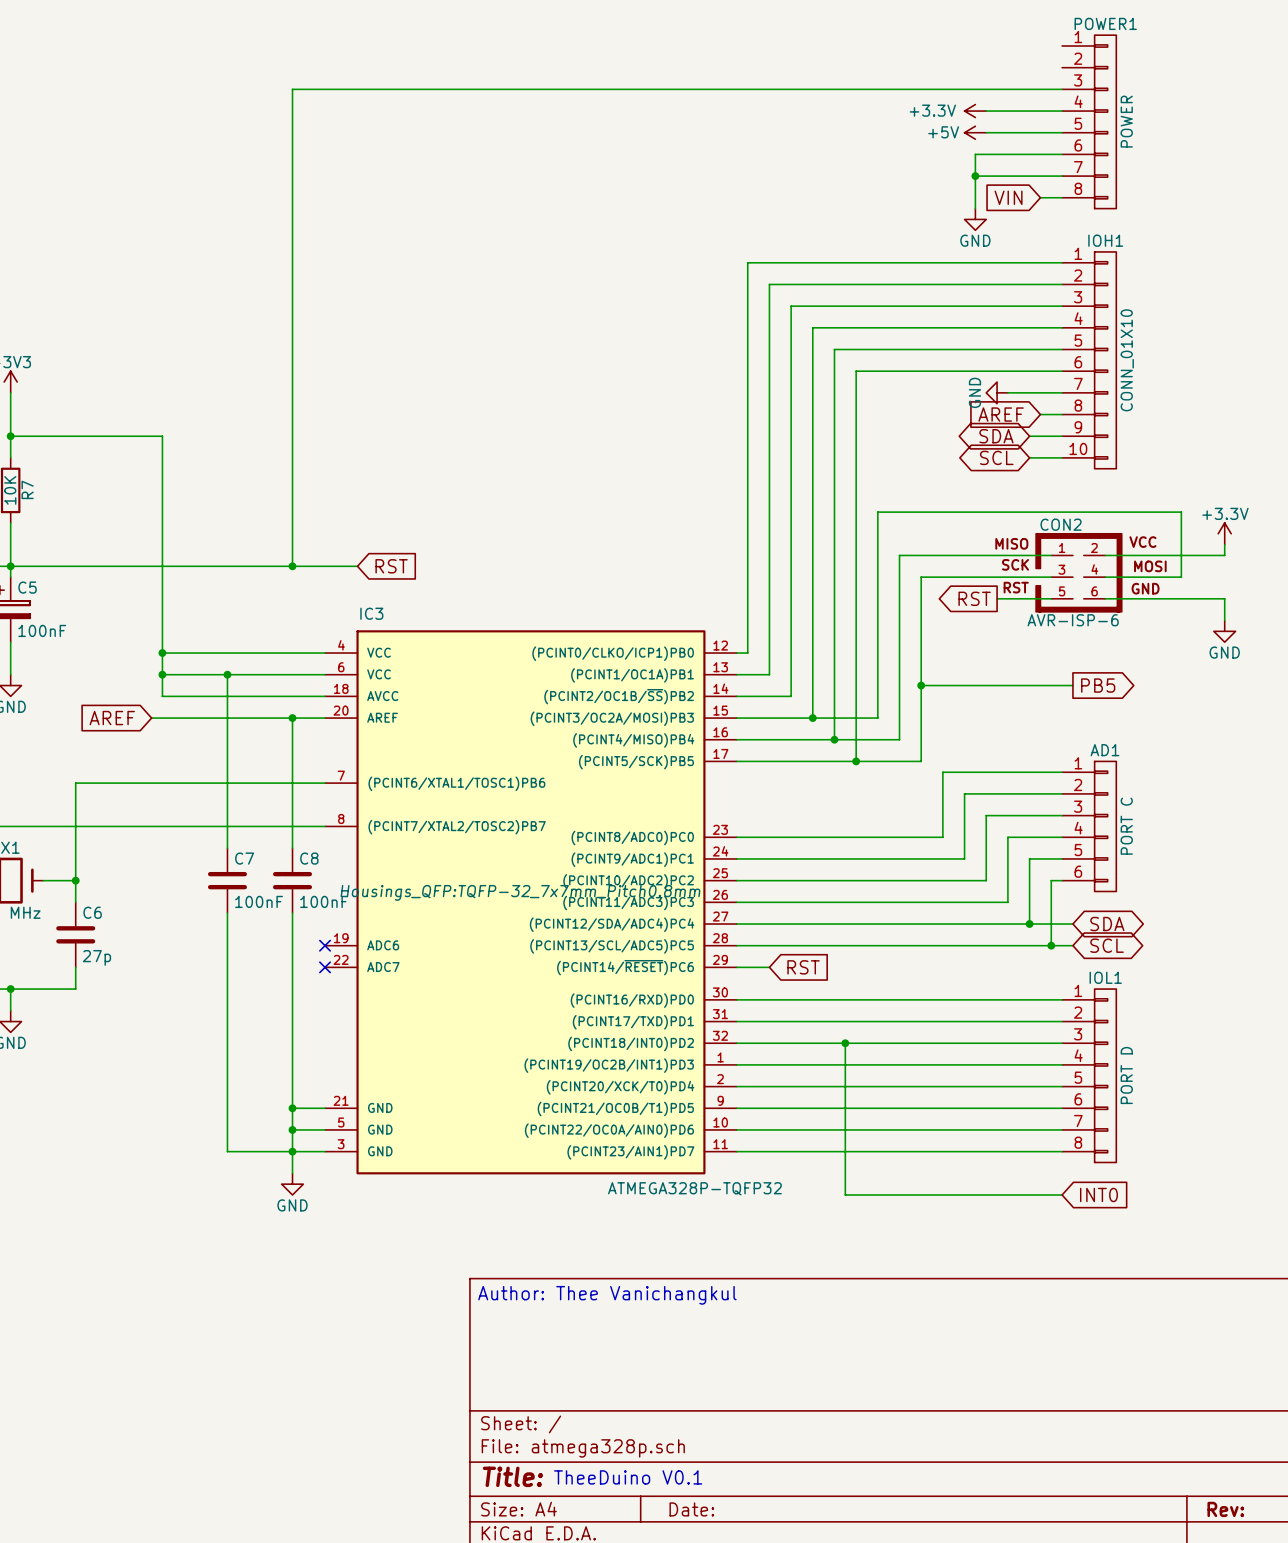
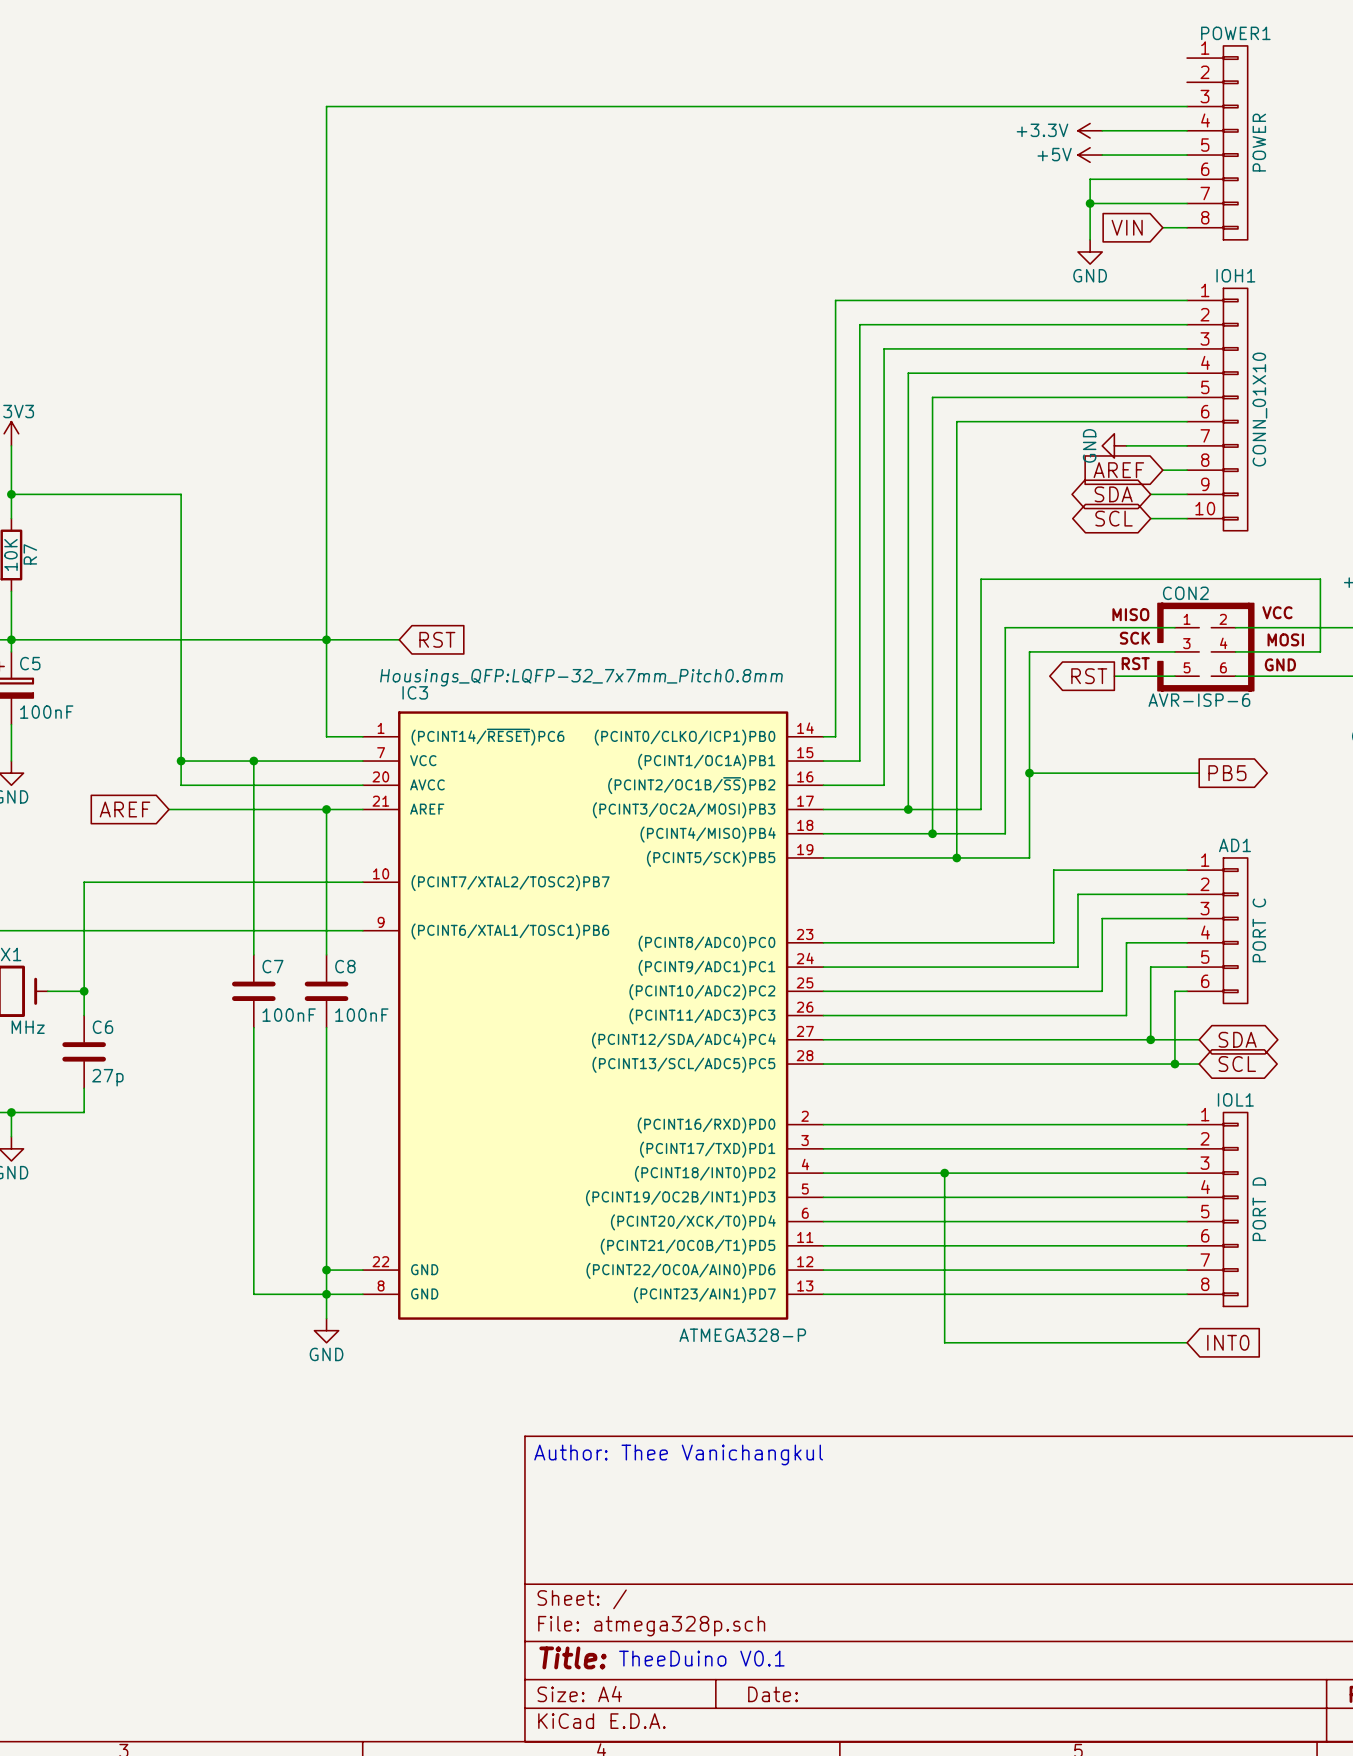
IC3 symbol: [325, 630, 737, 1175] -> [362, 711, 824, 1320]
wire: (162, 653) (292, 653) -> (326, 639) (326, 736)
junction: (162, 653) -> none
IC3 text: Housings_QFP:TQFP-32_7x7mm_Pitch0.8mm (520, 892) -> Housings_QFP:LQFP-32_7x7mm_Pitch0.8mm (581, 677)
no-connect mark: (325, 945) -> none
no-connect mark: (325, 967) -> none
wire: (736, 967) (769, 967) -> none
global label: RST (803, 967) -> none
wire: (292, 1108) (325, 1108) -> none
junction: (292, 1108) -> none
IC3 value: ATMEGA328P-TQFP32 (694, 1188) -> ATMEGA328-P (742, 1335)

